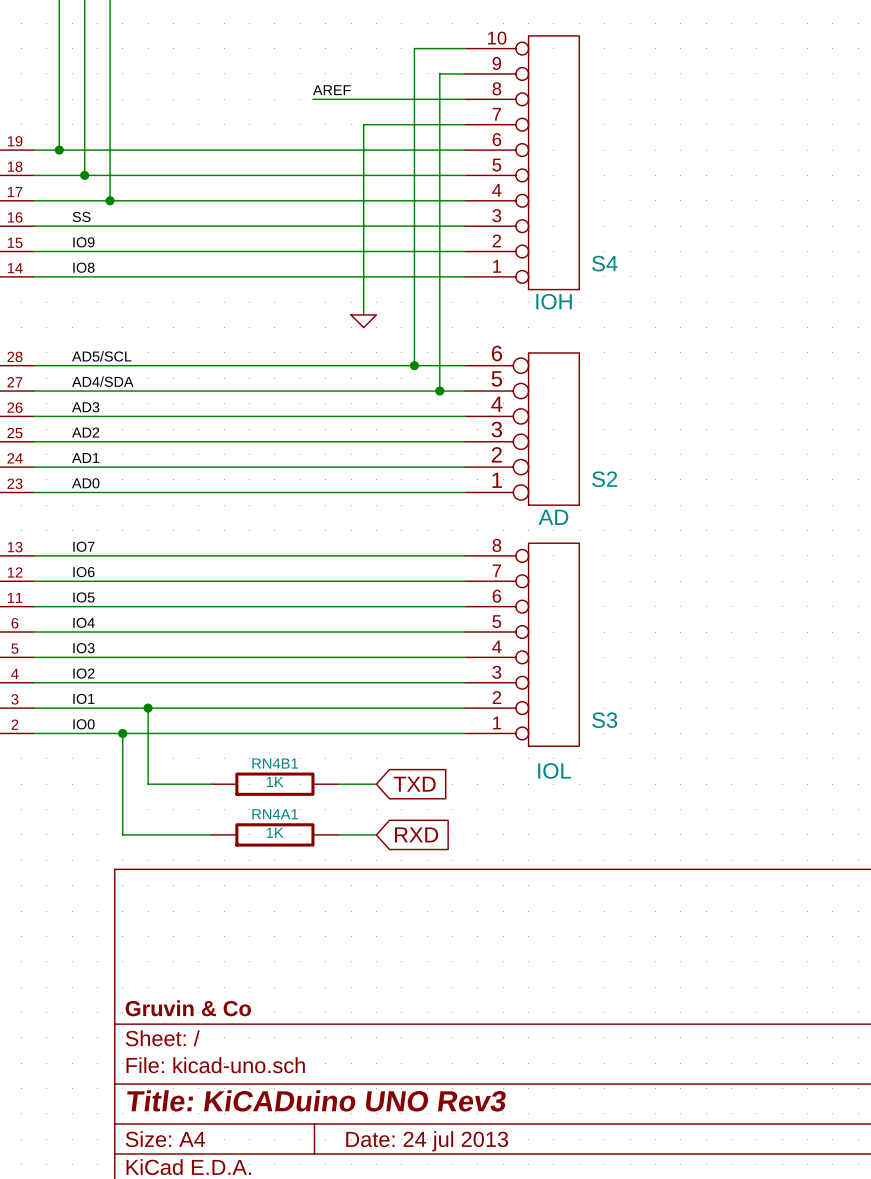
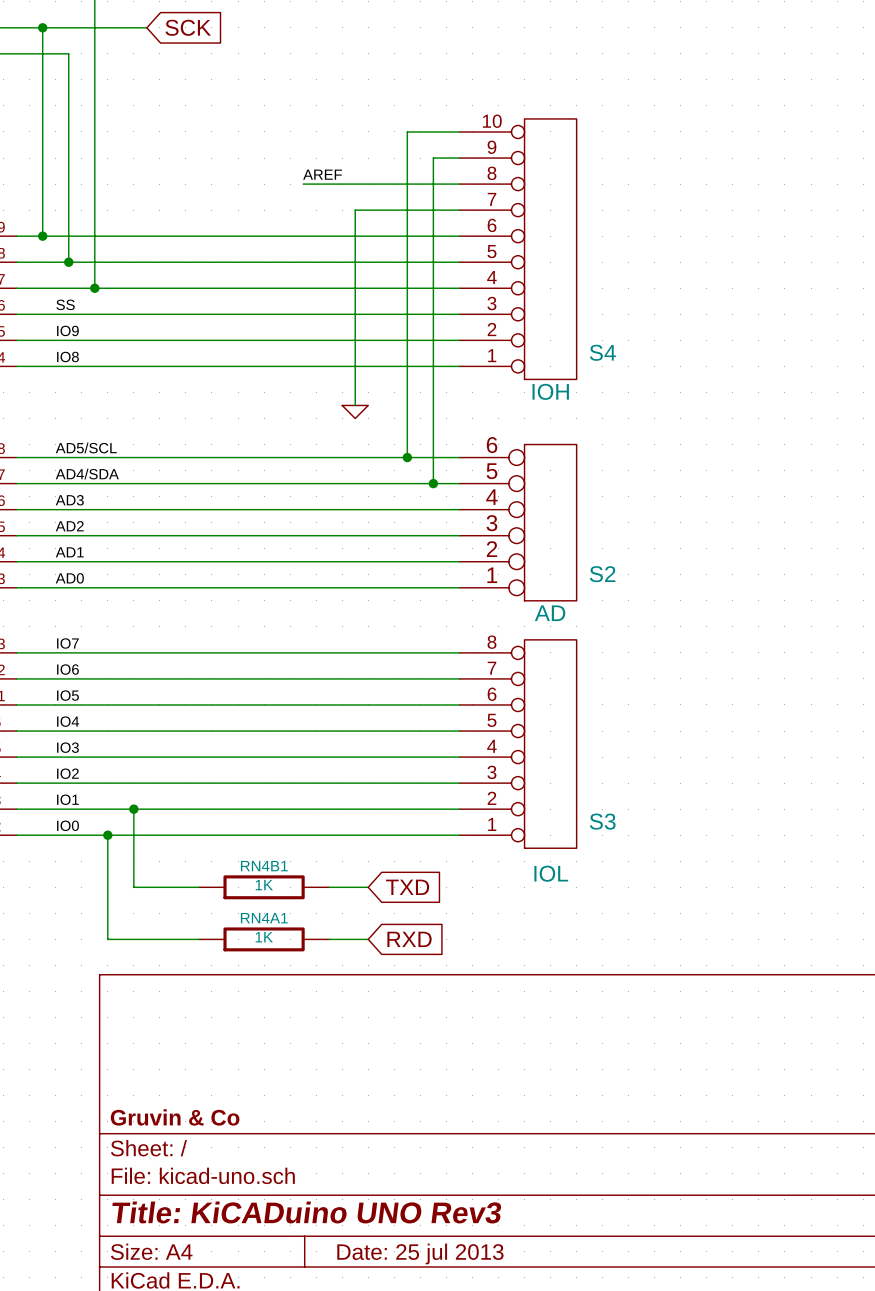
title block: Date: 24 jul 2013 (427, 1141) -> Date: 25 jul 2013 (420, 1253)

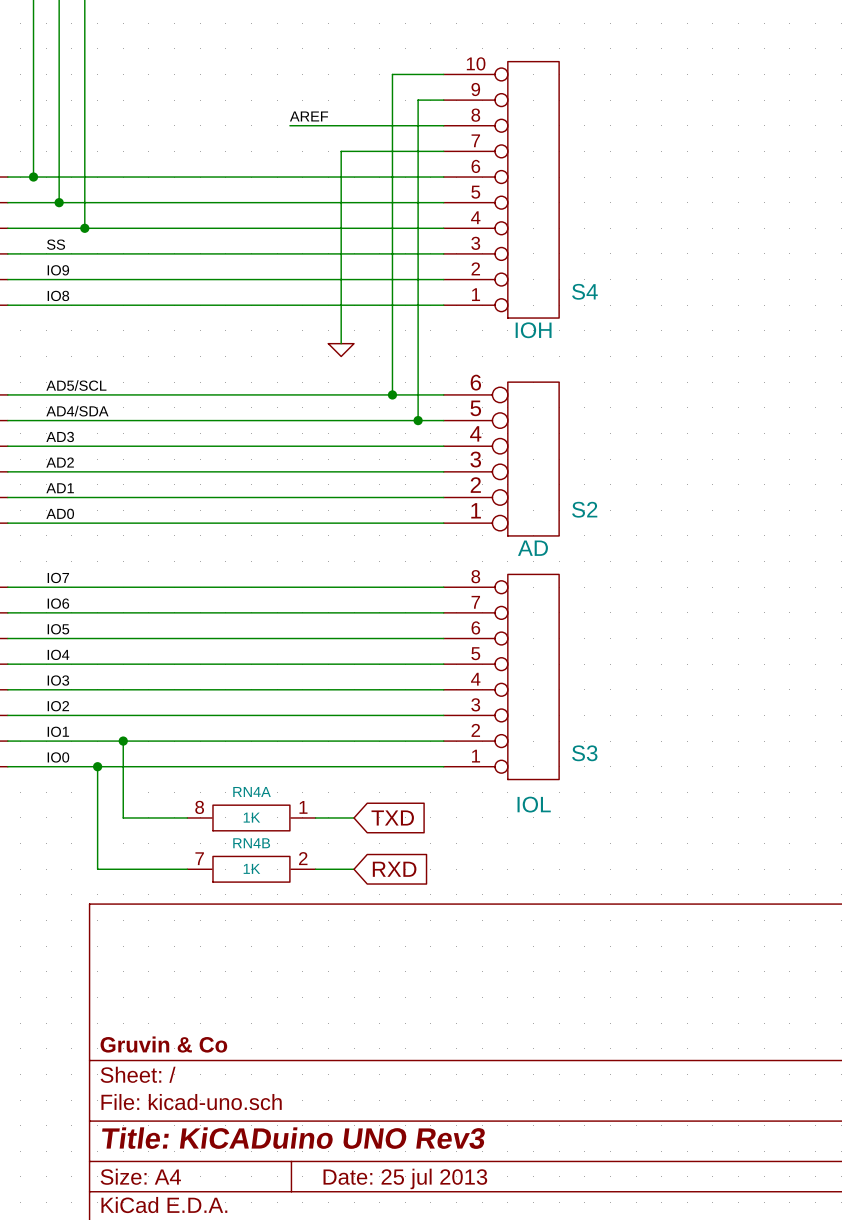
RN4B1: 1K (264, 887) -> none
RN4A: none -> 1K (251, 817)
RN4A1: 1K (264, 939) -> none
RN4B: none -> 1K (251, 869)

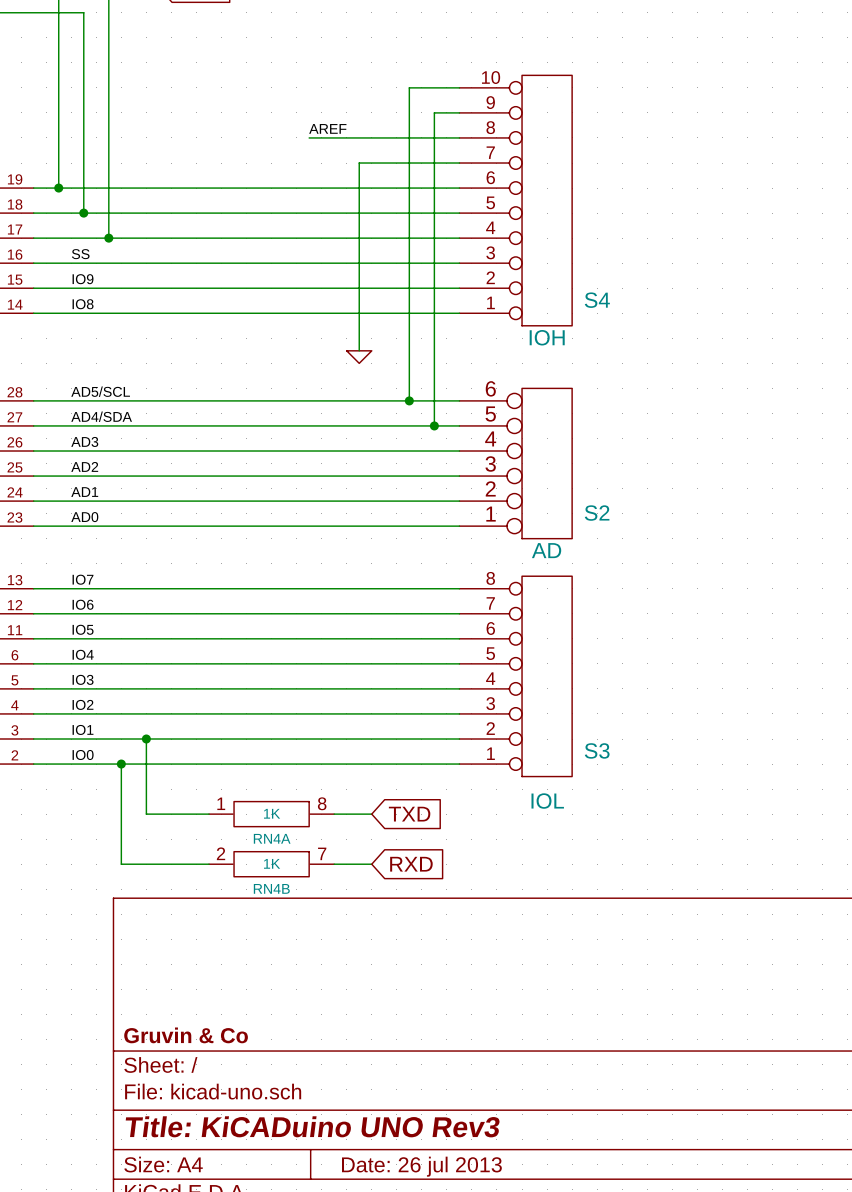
RN4A rotation: 0° (251, 817) -> 180° (271, 814)
RN4B rotation: 0° (251, 869) -> 180° (271, 864)
title block: Date: 25 jul 2013 (405, 1178) -> Date: 26 jul 2013 (421, 1166)

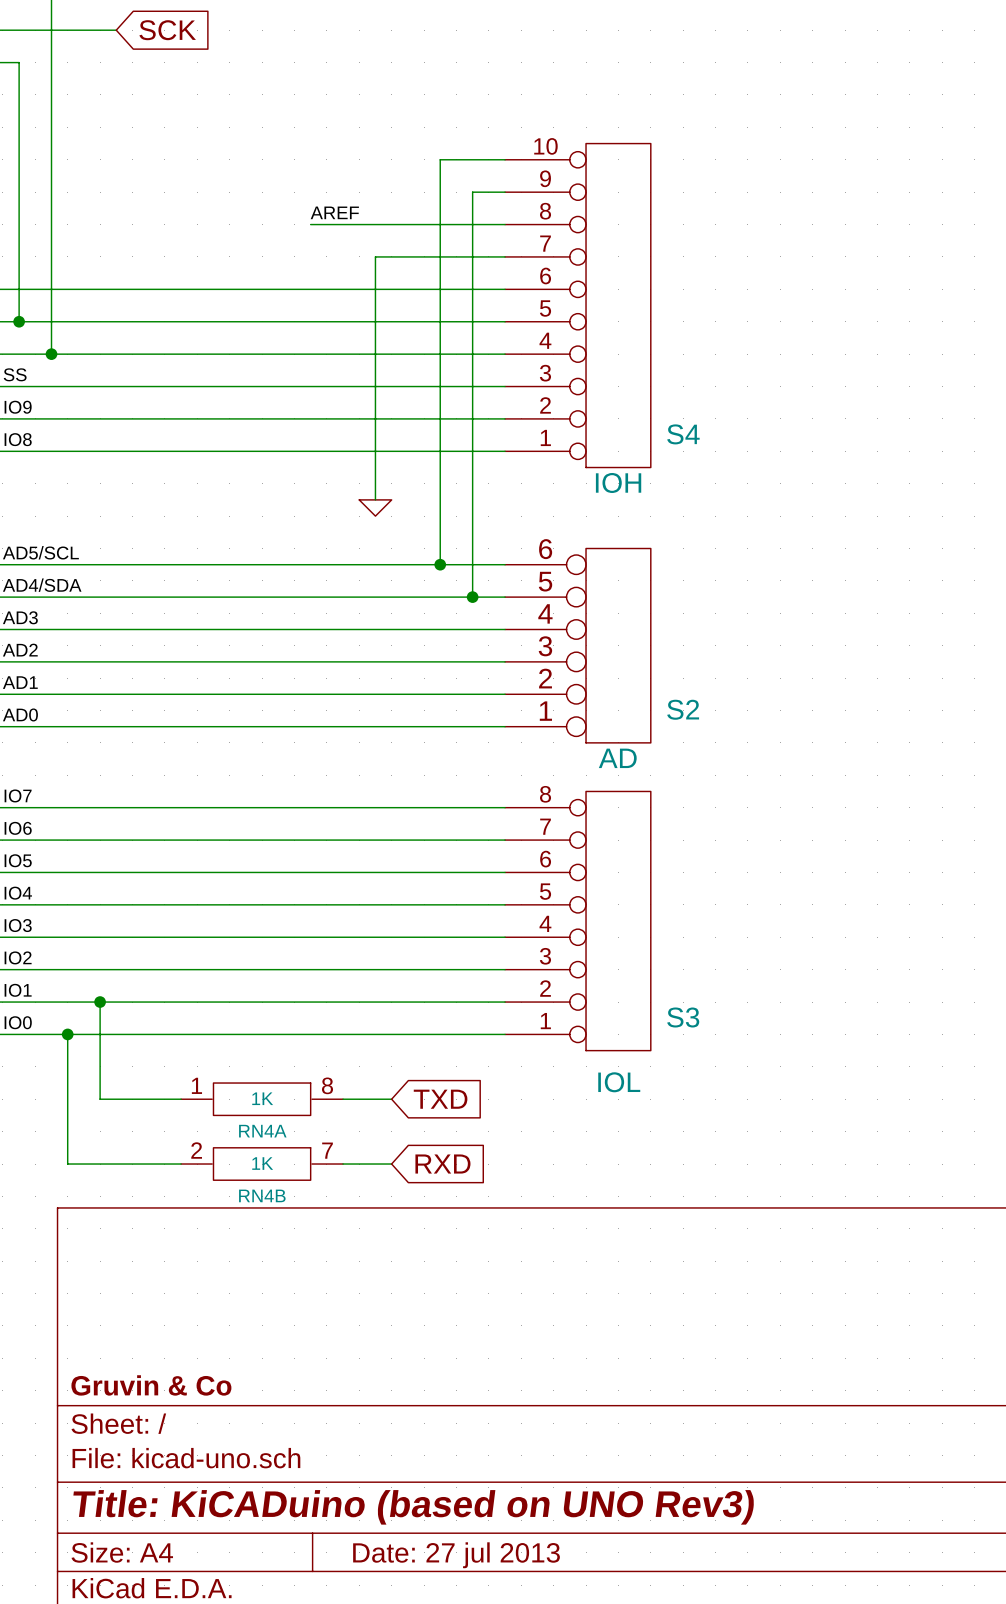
title block: Title: KiCADuino UNO Rev3 (312, 1126) -> Title: KiCADuino (based on UNO Rev3) (413, 1507)
title block: Date: 26 jul 2013 (421, 1166) -> Date: 27 jul 2013 (456, 1555)

